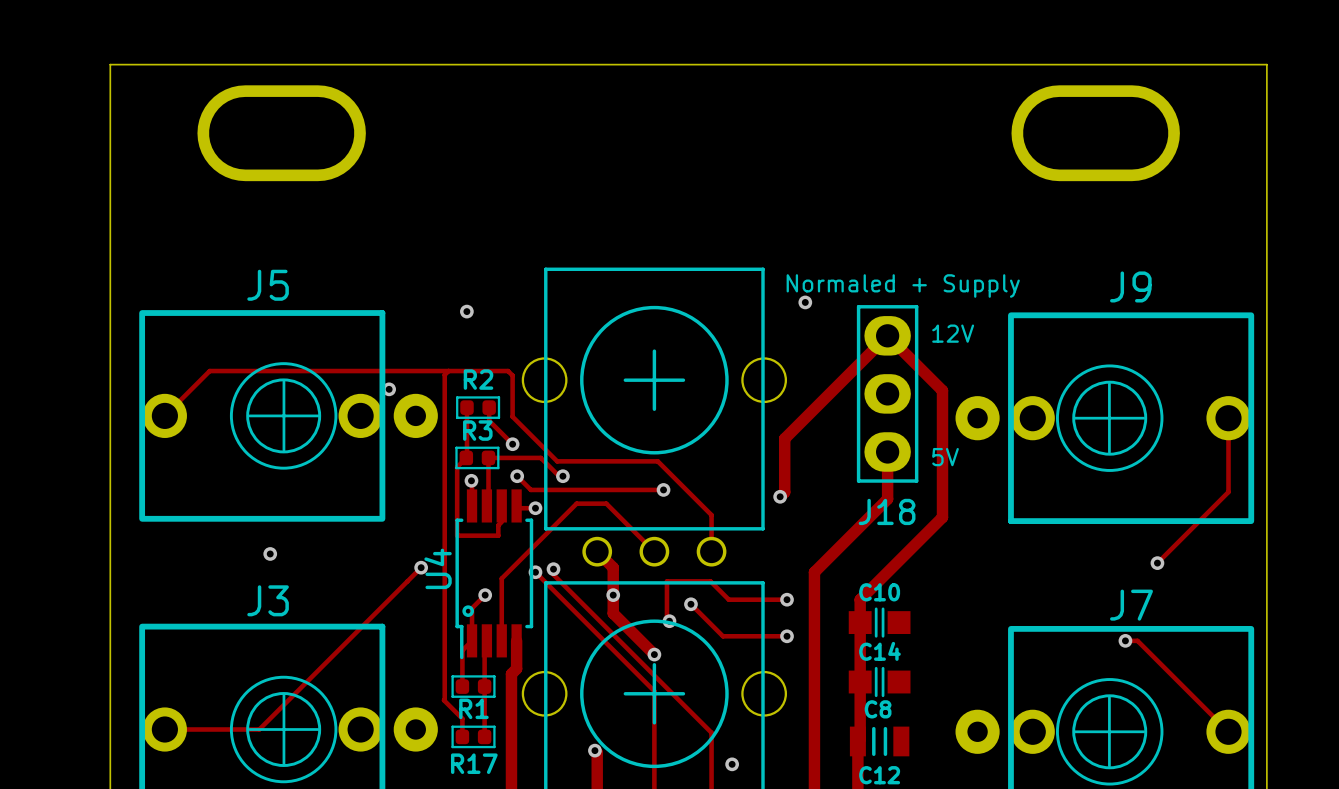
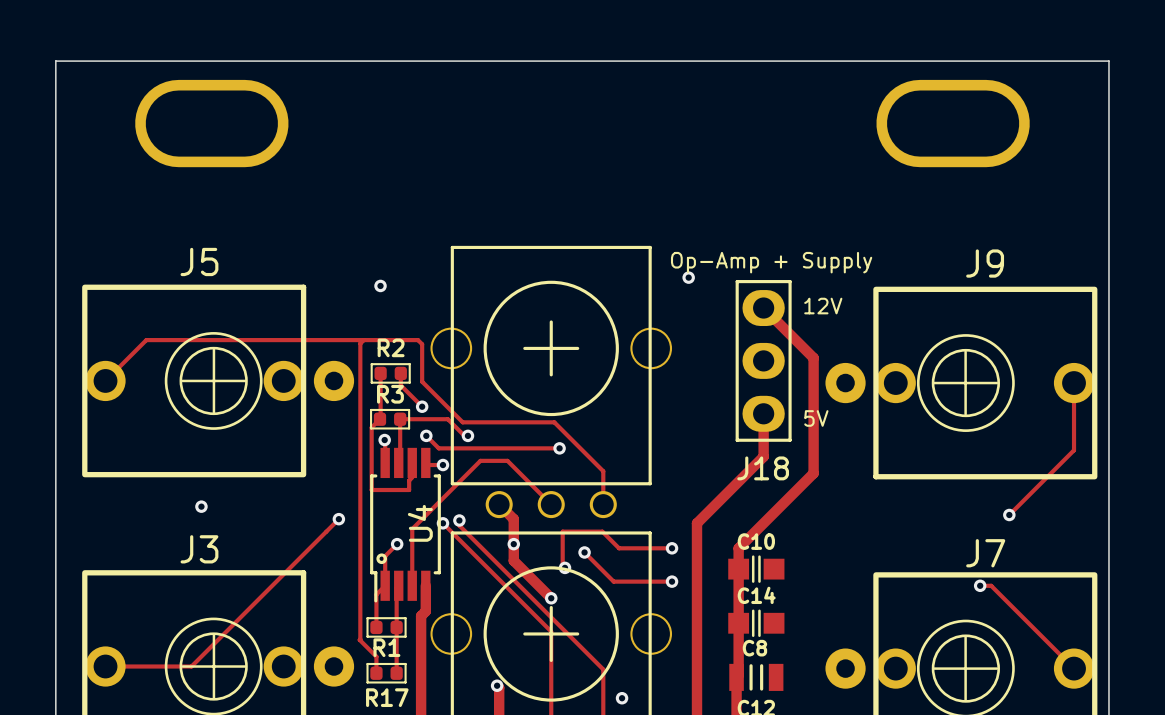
text: Normaled + Supply (903, 285) -> Op-Amp + Supply (771, 262)
track: (887, 335) (784, 438) (784, 492) (780, 496) -> none
via: (389, 389) -> none
via: (780, 496) -> none
U4 name position: U4 (438, 568) -> U4 (420, 523)

